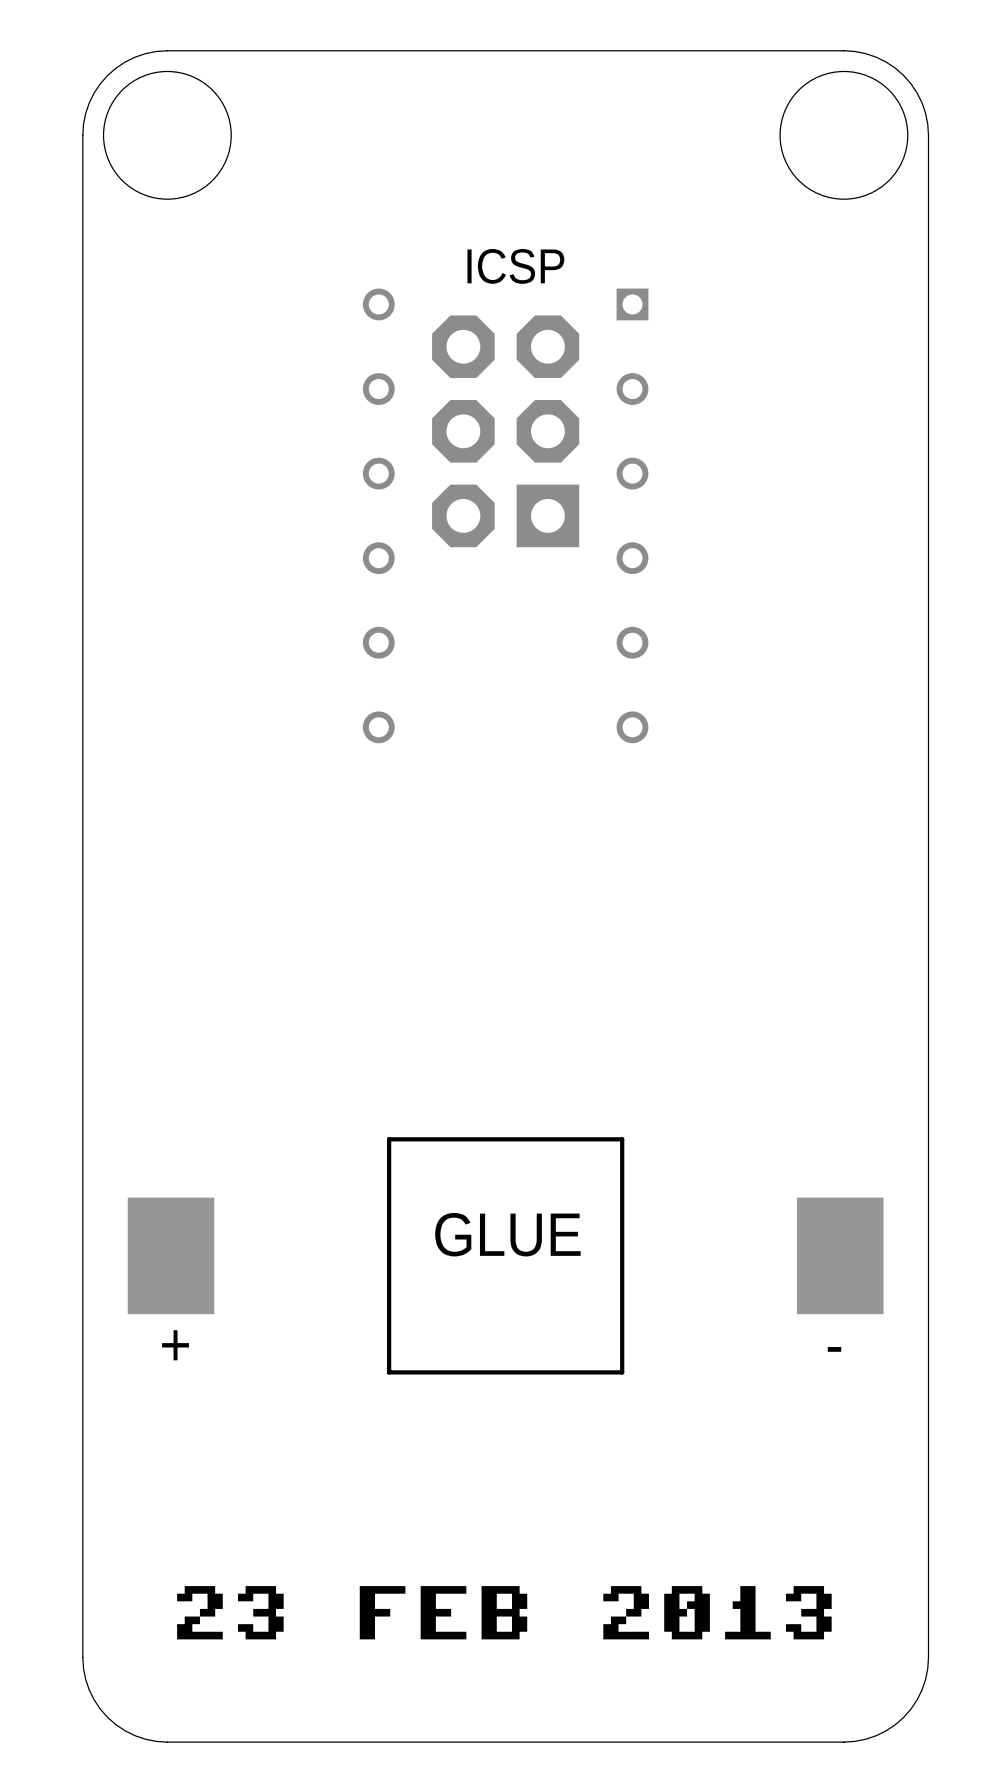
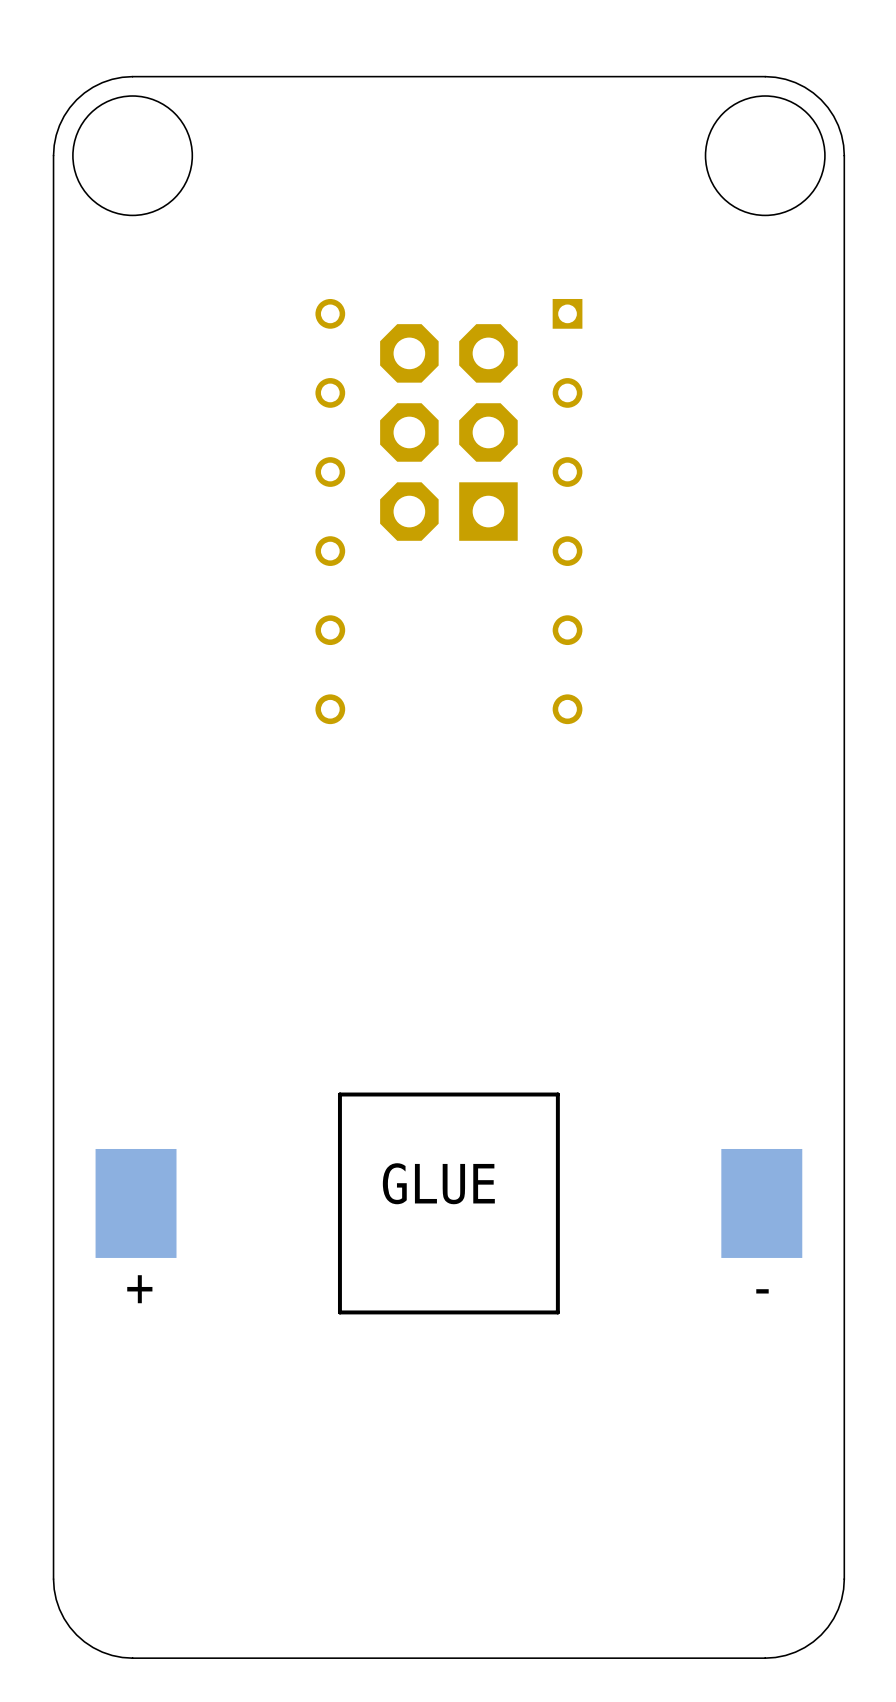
text: ICSP (515, 266) -> none
drawing: [177, 1586, 832, 1640] -> none

